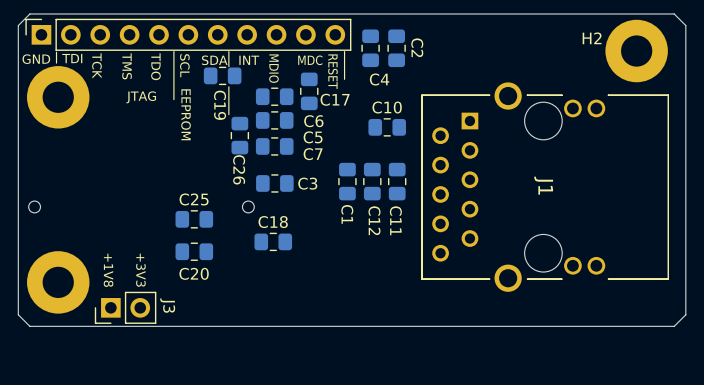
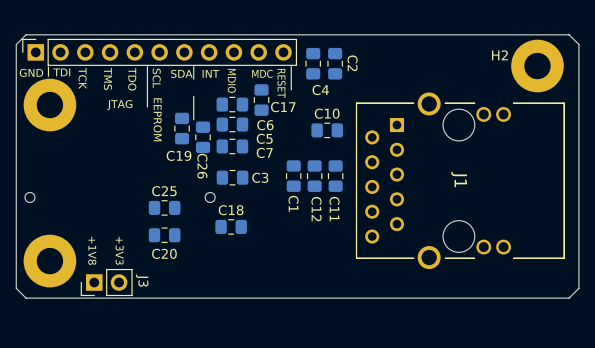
C19 rotation: 0° (222, 75) -> 90° clockwise (182, 128)
C19 position: (222, 75) -> (182, 128)

